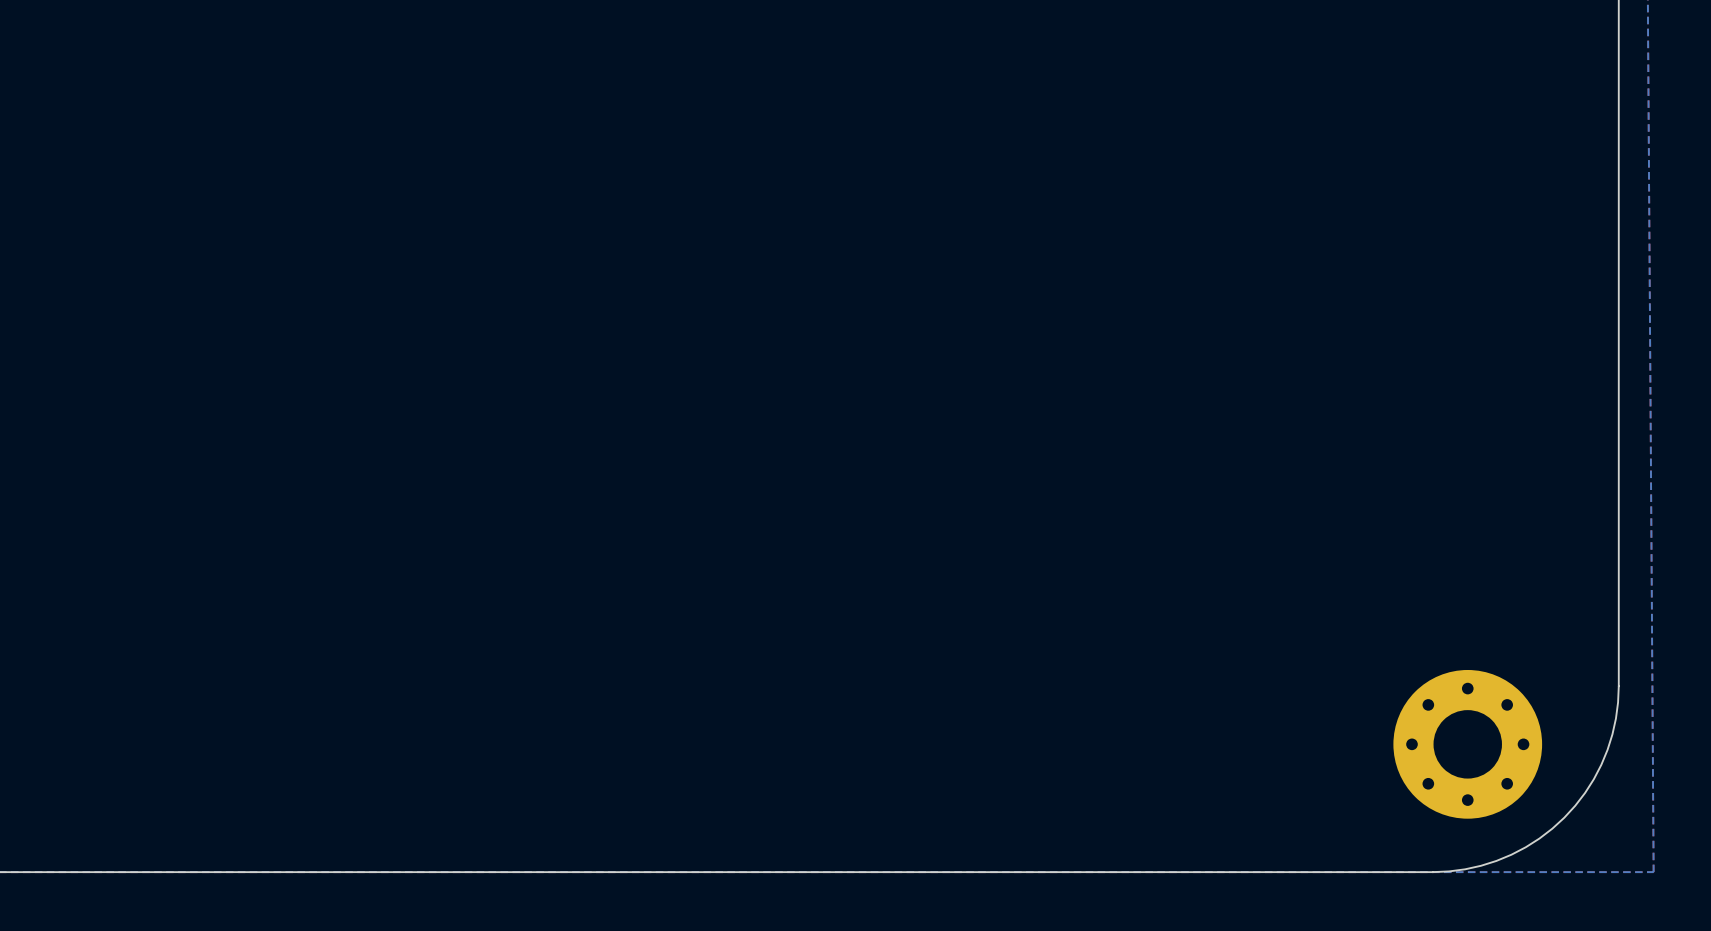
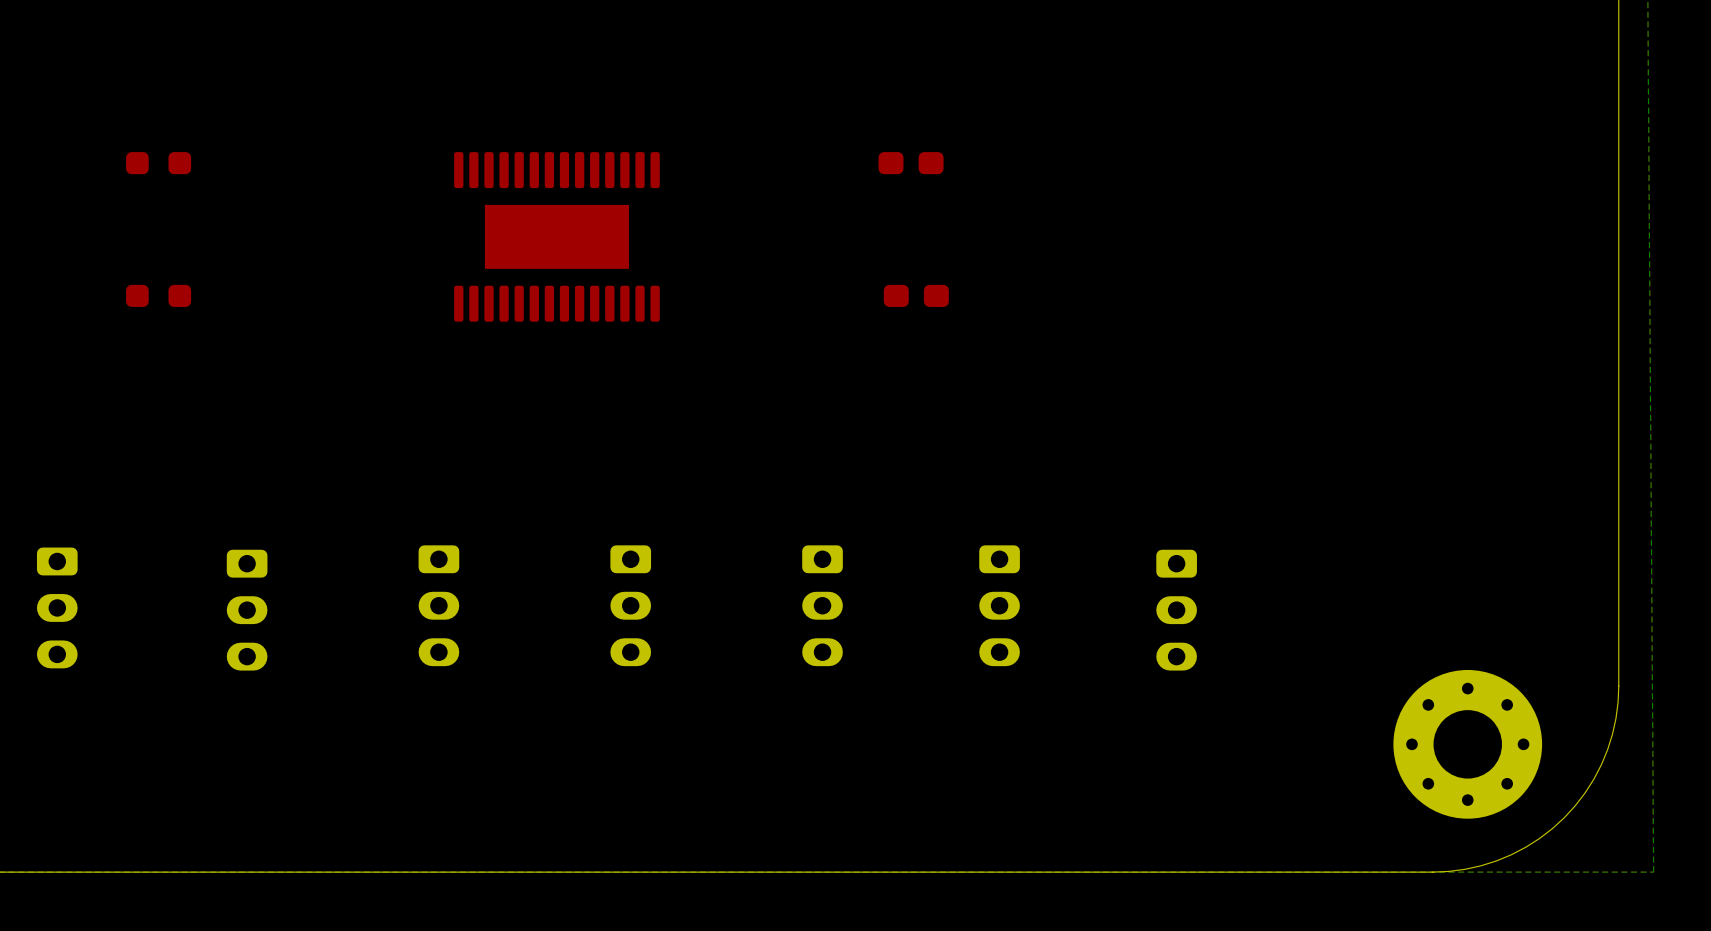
part: none -> (158, 163)
part: none -> (911, 163)
part: none -> (556, 236)
part: none -> (158, 295)
part: none -> (916, 295)
part: none -> (438, 605)
part: none -> (630, 605)
part: none -> (822, 605)
part: none -> (999, 605)
part: none -> (57, 607)
part: none -> (247, 610)
part: none -> (1176, 610)

